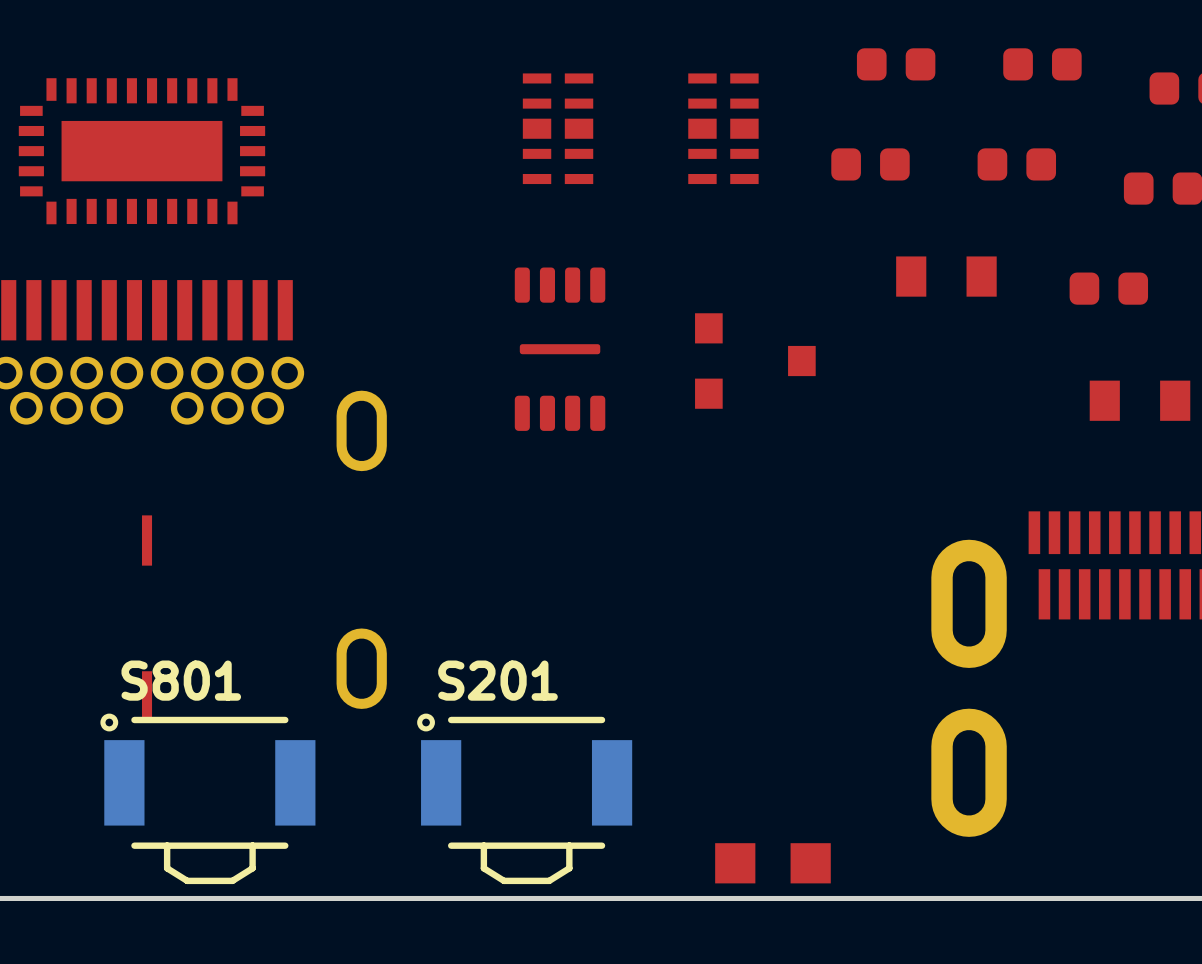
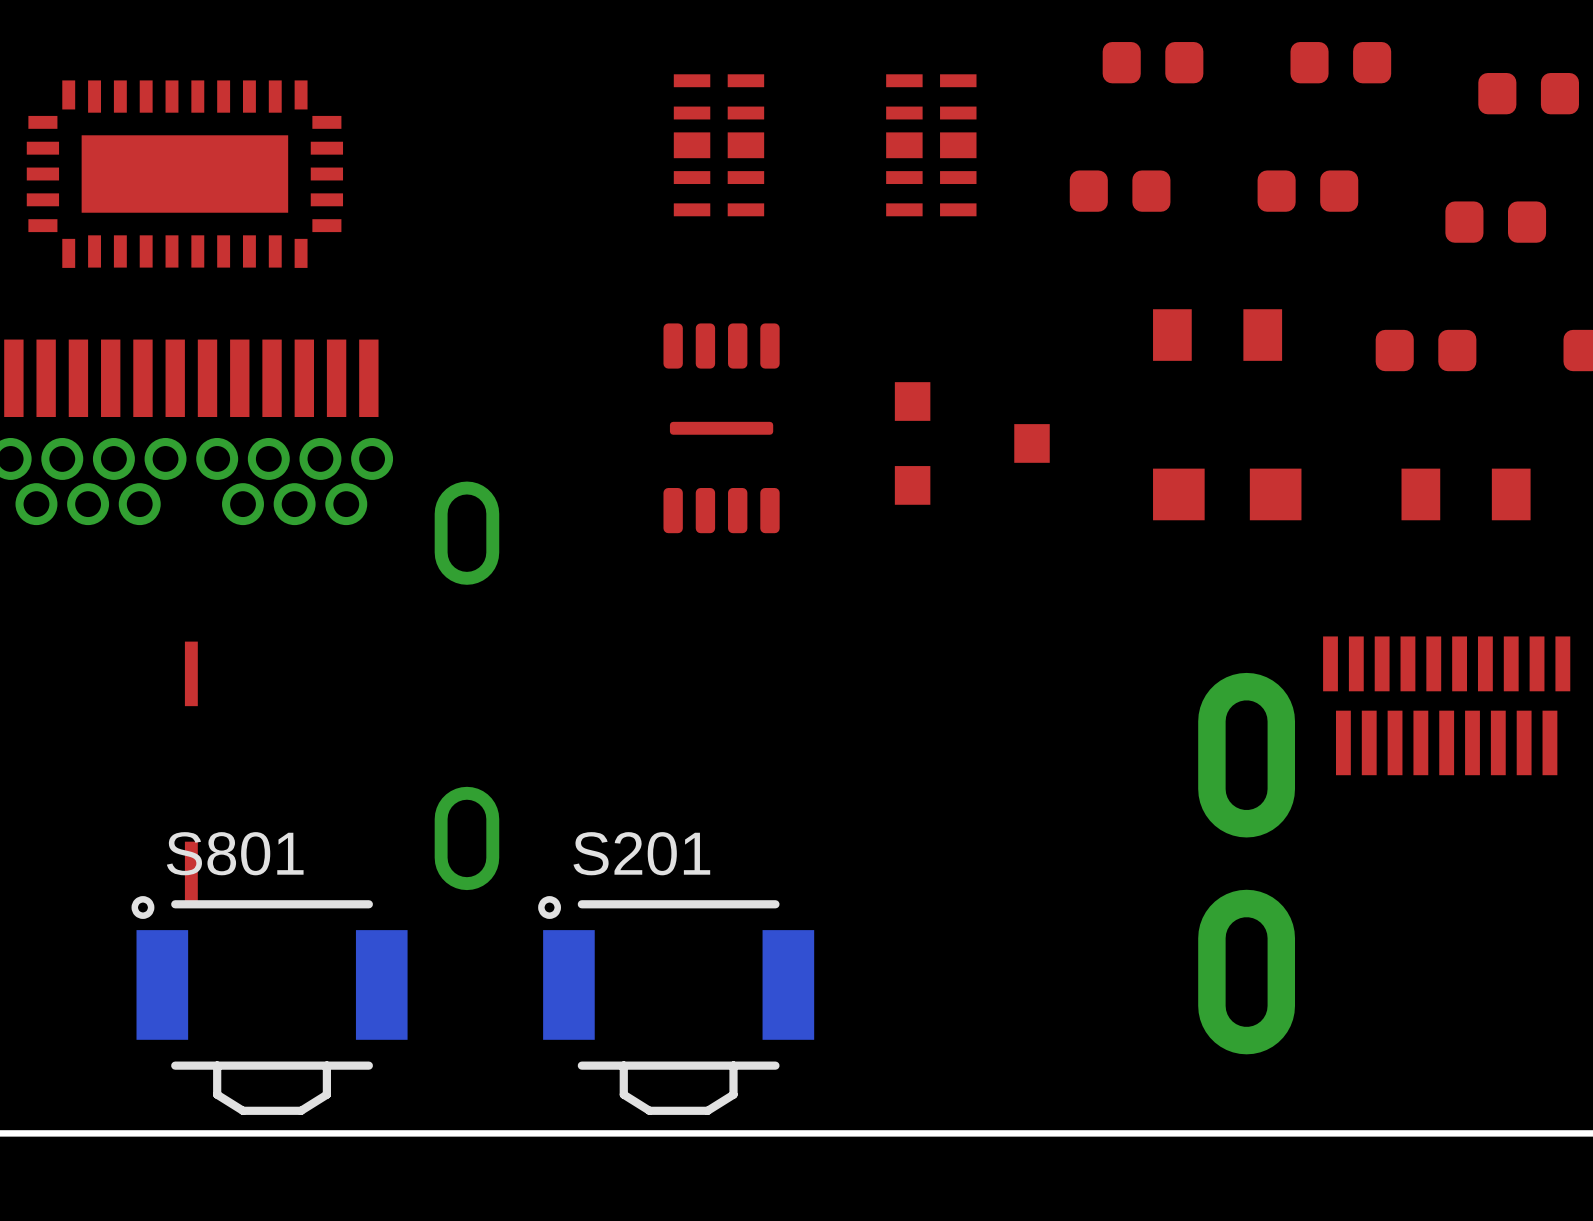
part position: (772, 863) -> (1227, 494)

